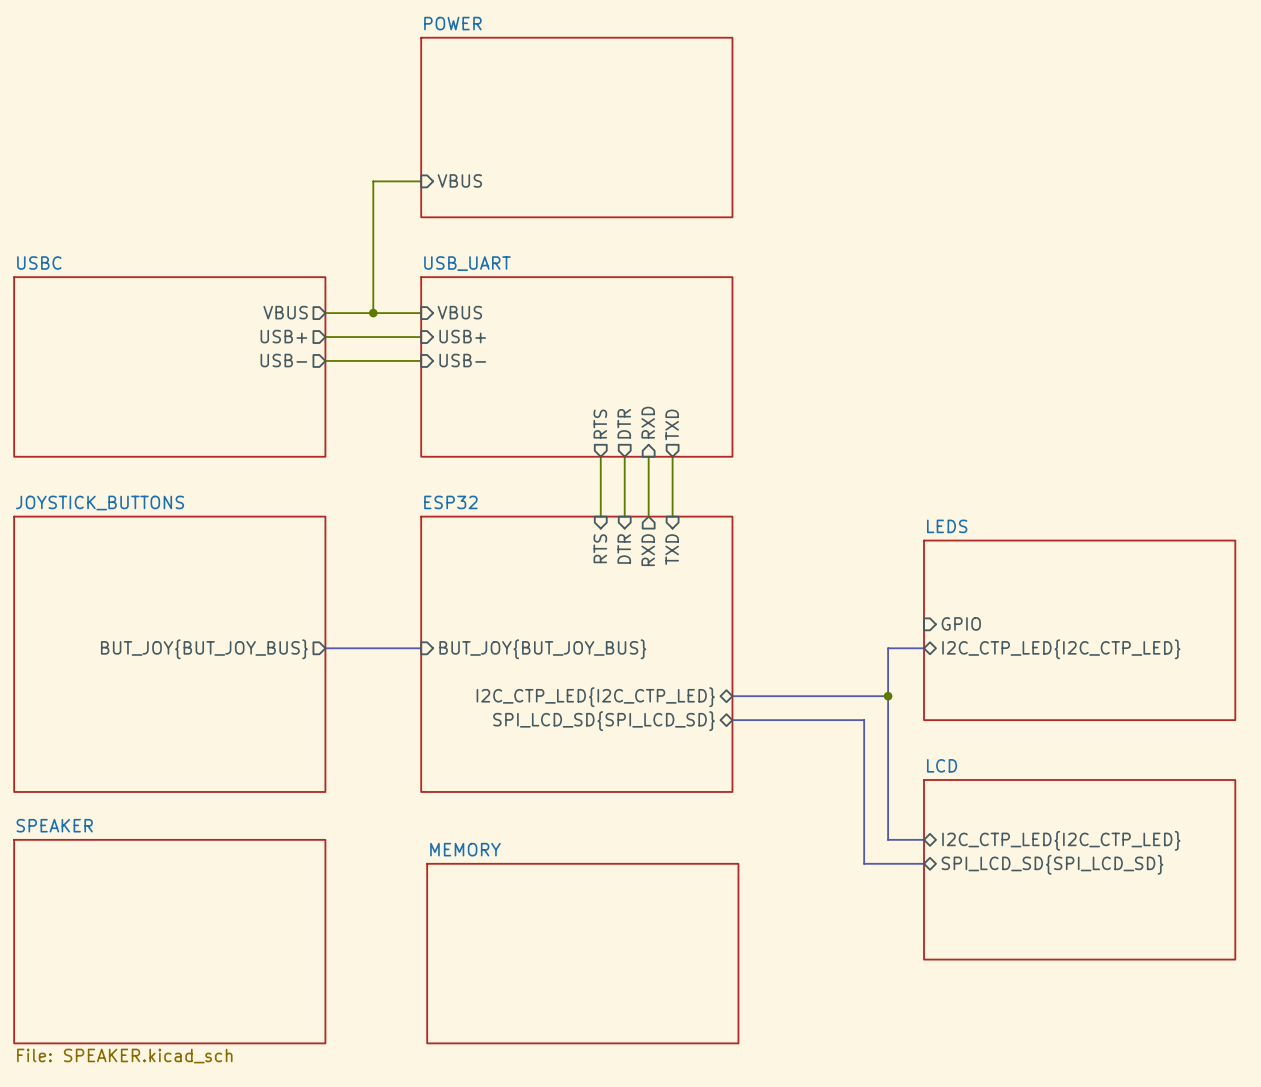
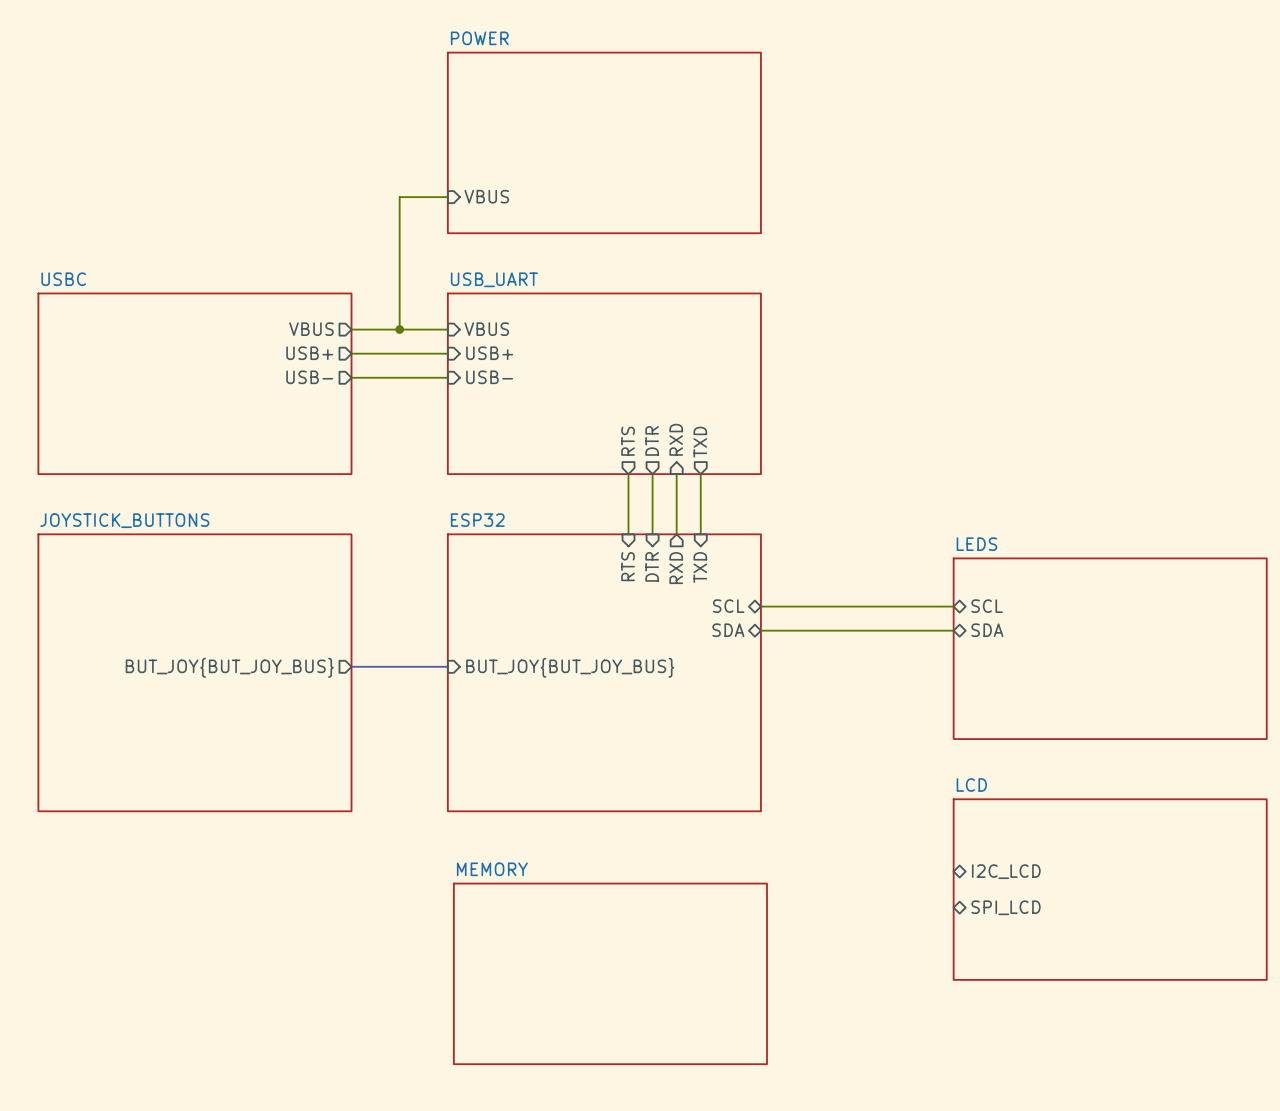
sheet pin: none -> SCL (728, 606)
wire: none -> (760, 606) (953, 606)
sheet pin: none -> SCL (987, 606)
sheet pin: none -> SDA (728, 630)
sheet pin: none -> SDA (987, 630)
wire: none -> (760, 630) (953, 630)
sheet pin: GPIO (961, 623) -> none
bus: (924, 648) (888, 648) (888, 839) (924, 839) -> none
sheet pin: I2C_CTP_LED{I2C_CTP_LED} (1061, 649) -> none
bus: (732, 696) (888, 696) -> none
junction: (888, 696) -> none
sheet pin: I2C_CTP_LED{I2C_CTP_LED} (595, 697) -> none
bus: (732, 720) (864, 720) (864, 863) (924, 863) -> none
sheet pin: SPI_LCD_SD{SPI_LCD_SD} (604, 721) -> none
sheet pin: I2C_CTP_LED{I2C_CTP_LED} (1061, 840) -> none
sheet pin: none -> I2C_LCD (1006, 871)
sheet pin: SPI_LCD_SD{SPI_LCD_SD} (1052, 864) -> none
sheet pin: none -> SPI_LCD (1006, 907)
sheet SPEAKER: File: SPEAKER.kicad_sch (169, 941) -> none

